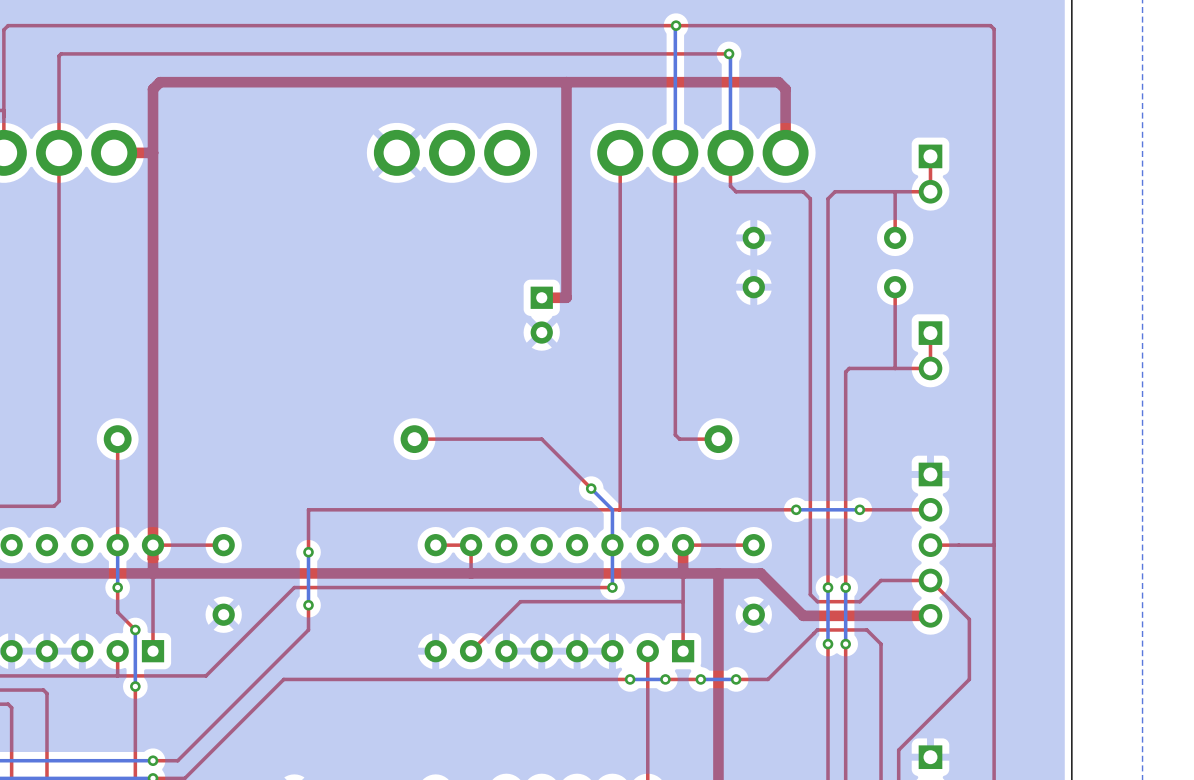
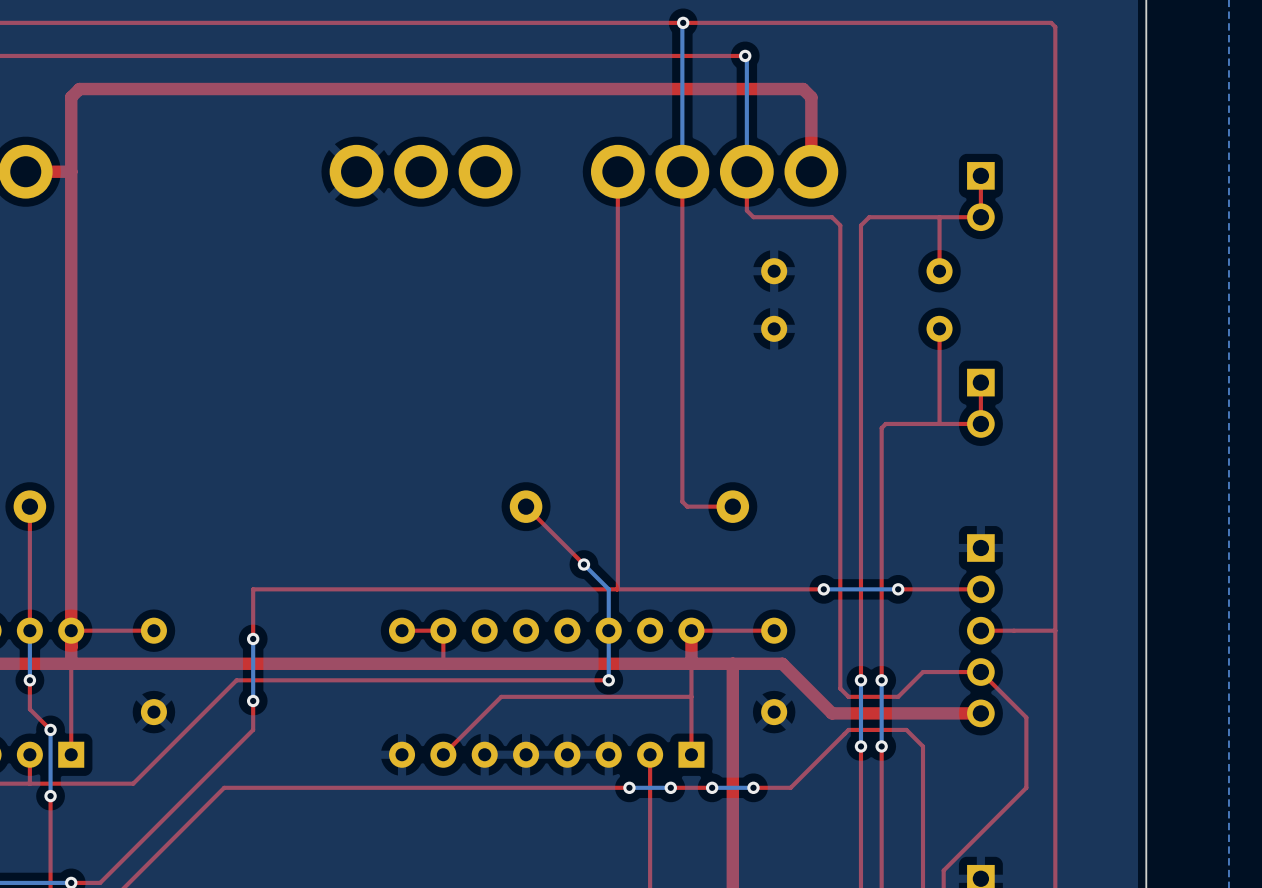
top track: (566, 82) (566, 297) (541, 297) -> none
part: (541, 315) -> none
part position: (414, 439) -> (526, 506)
top track: (541, 439) (414, 439) -> none

